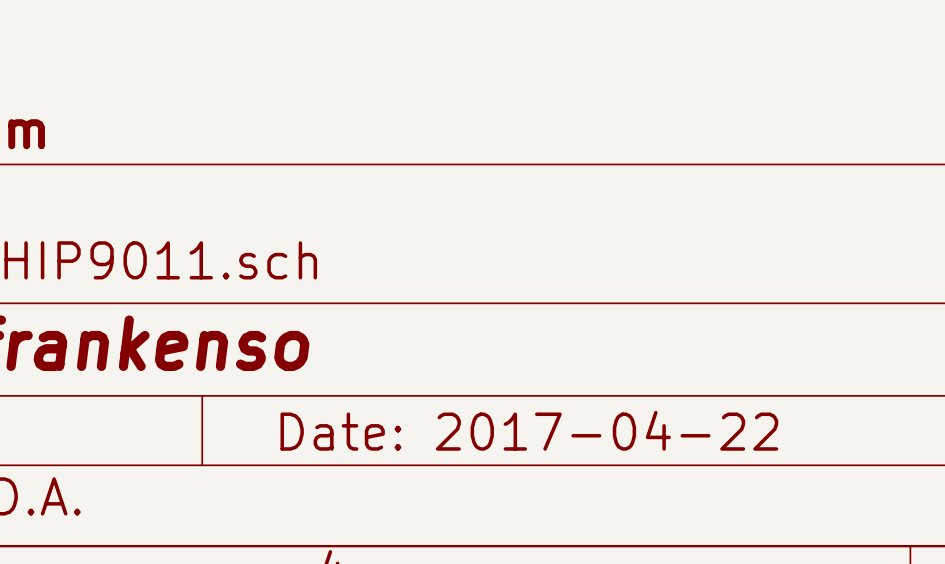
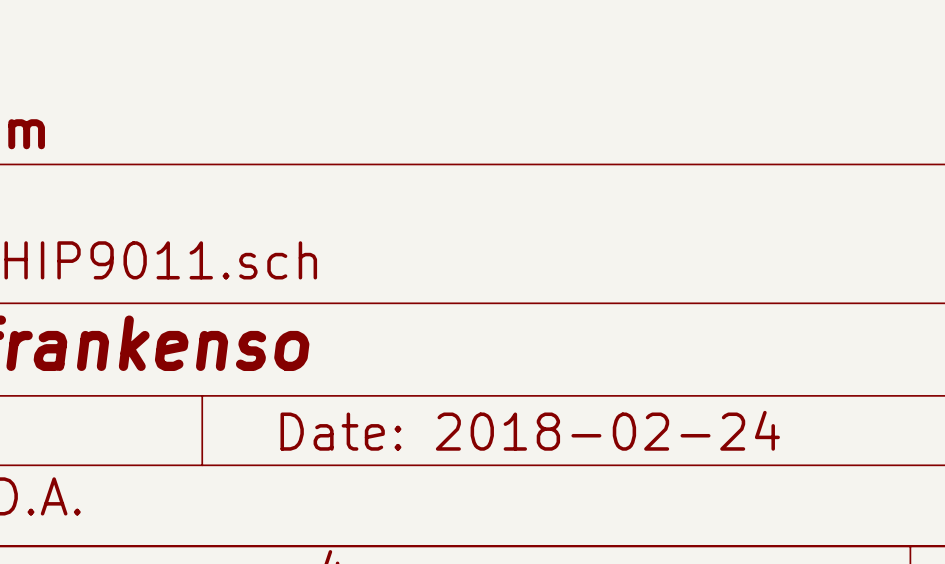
title block: Date: 2017-04-22 (529, 430) -> Date: 2018-02-24 (530, 430)

